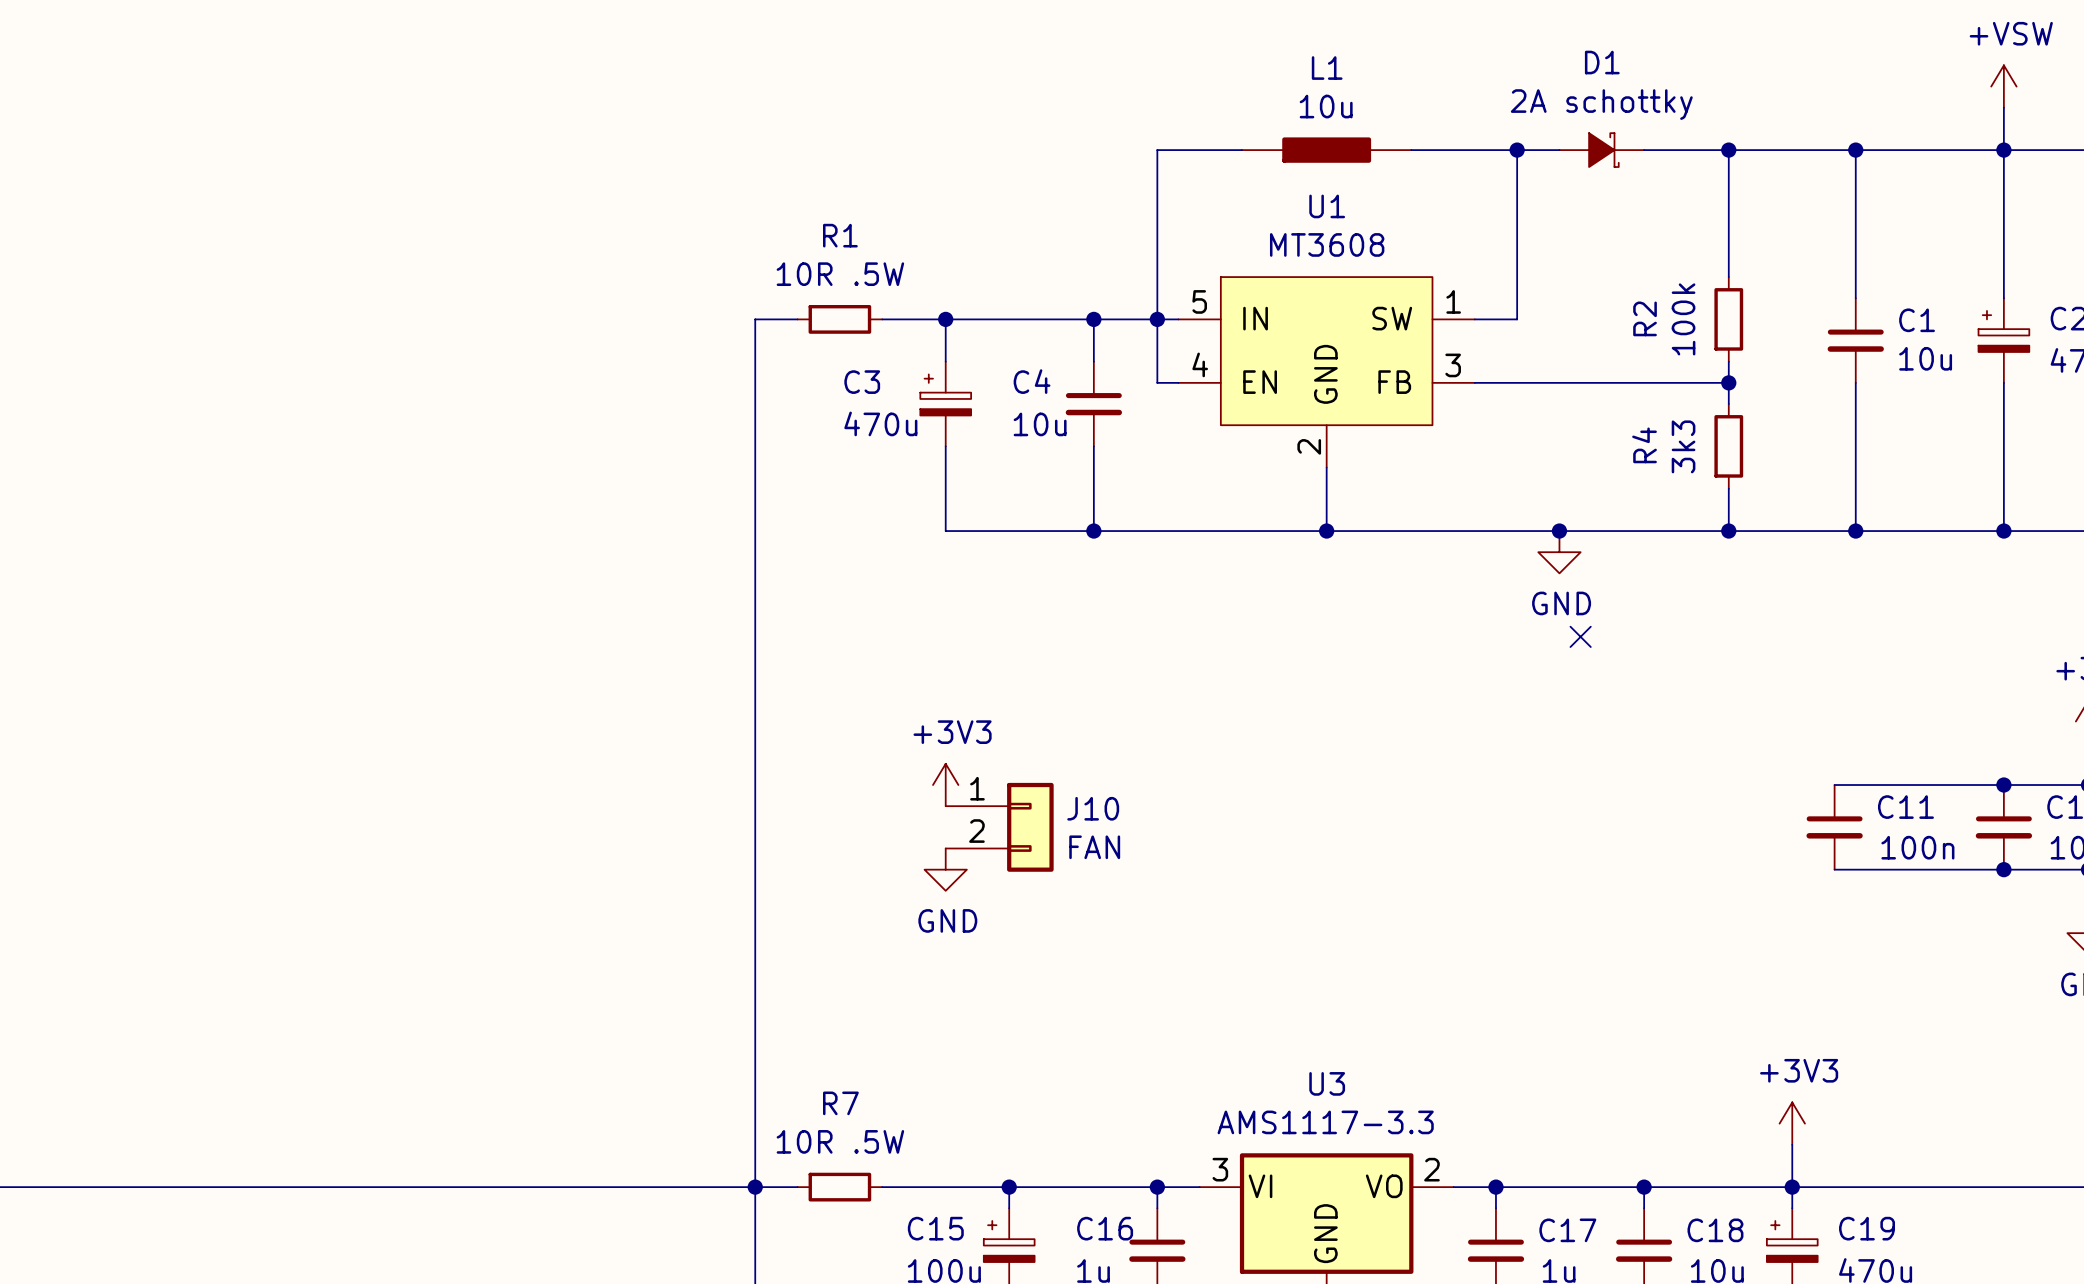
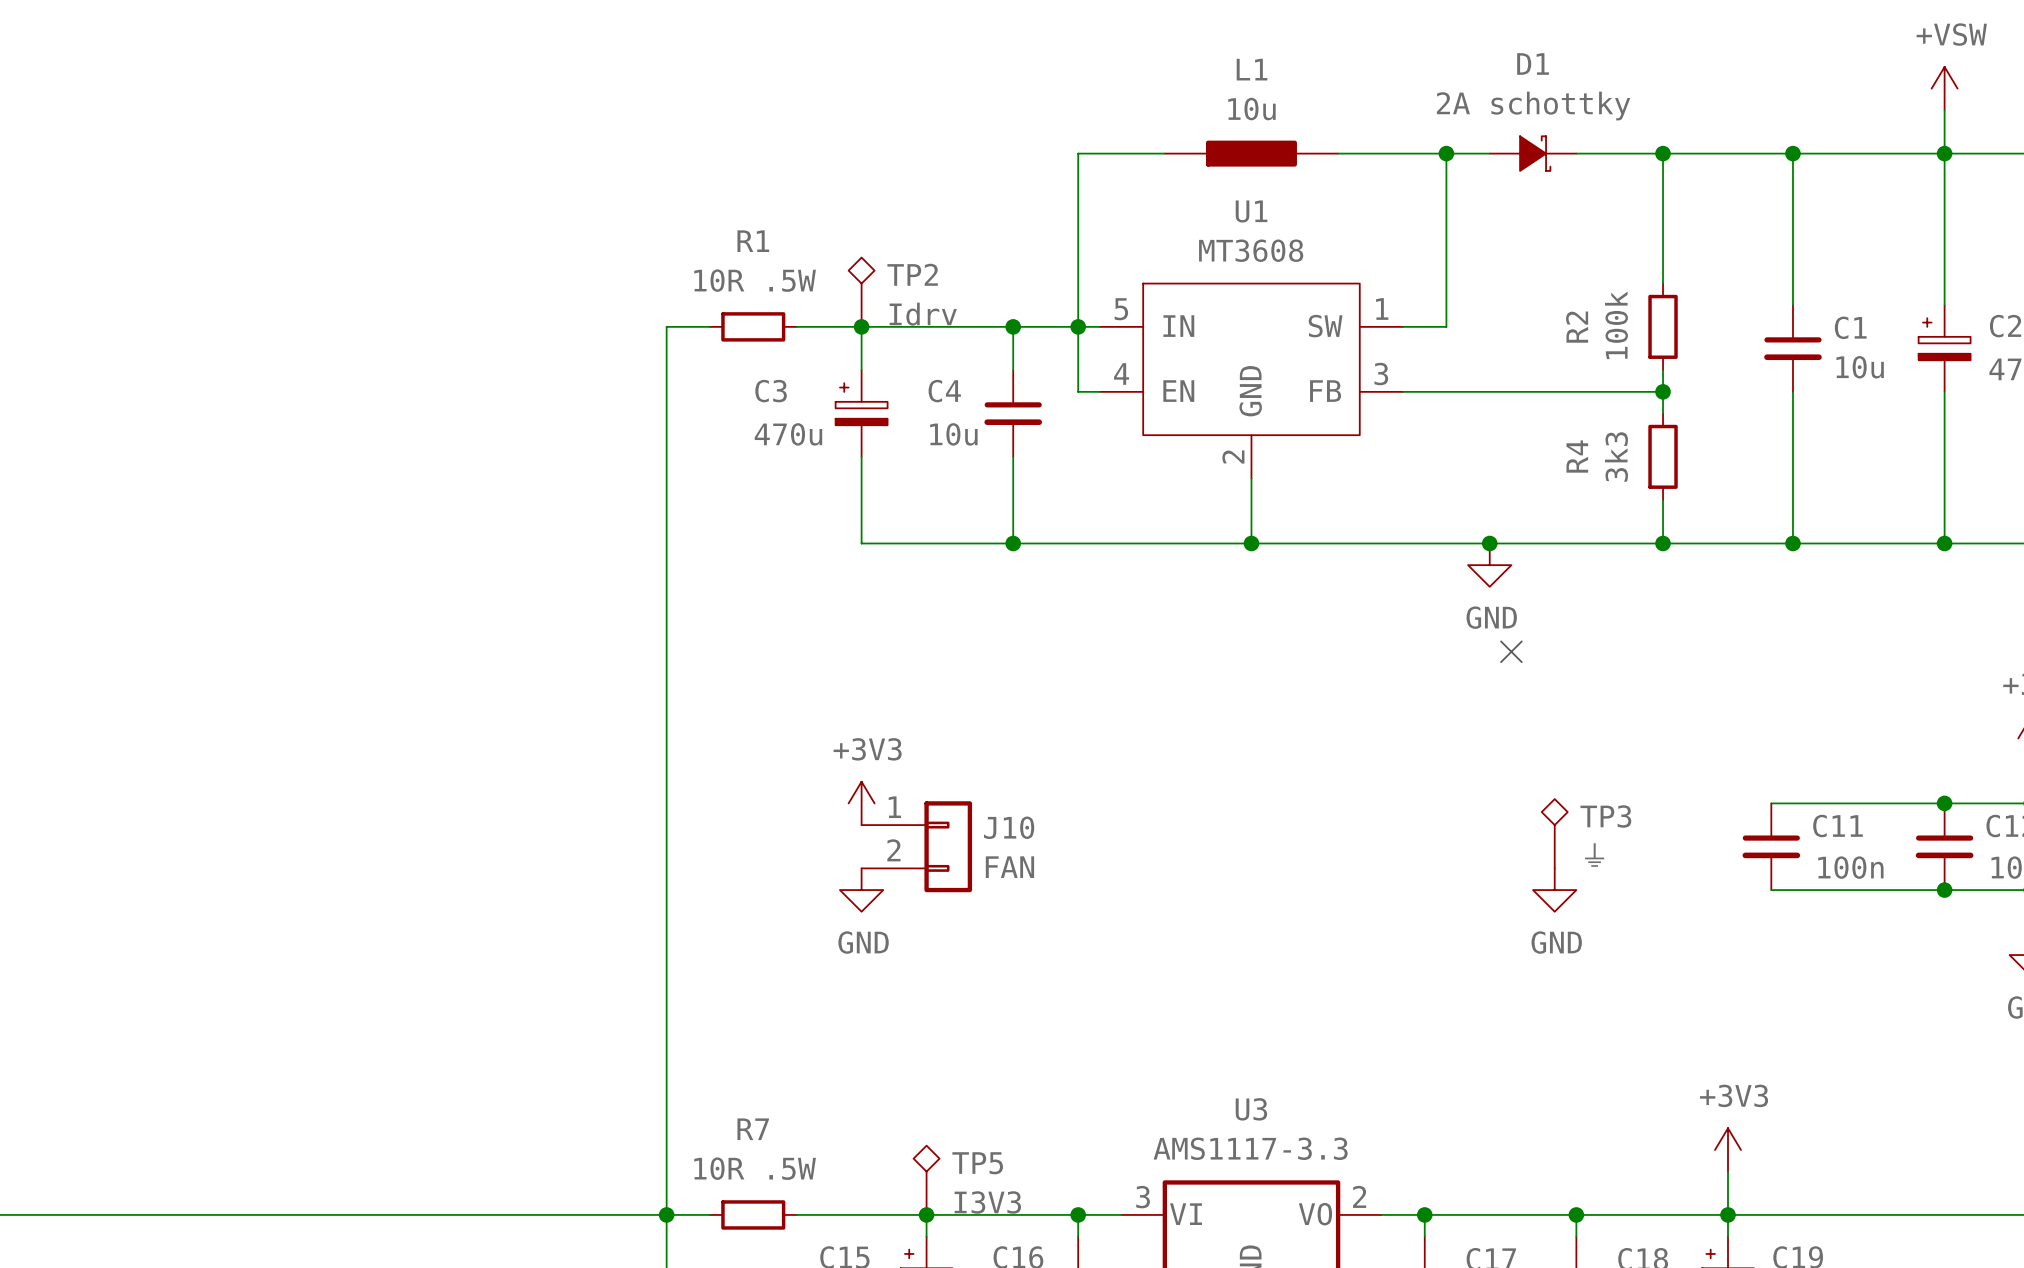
TP2: none -> Idrv (861, 292)
TP3: none -> ⏚ (1554, 833)
power symbol: none -> GND (1554, 890)
TP5: none -> I3V3 (926, 1180)

